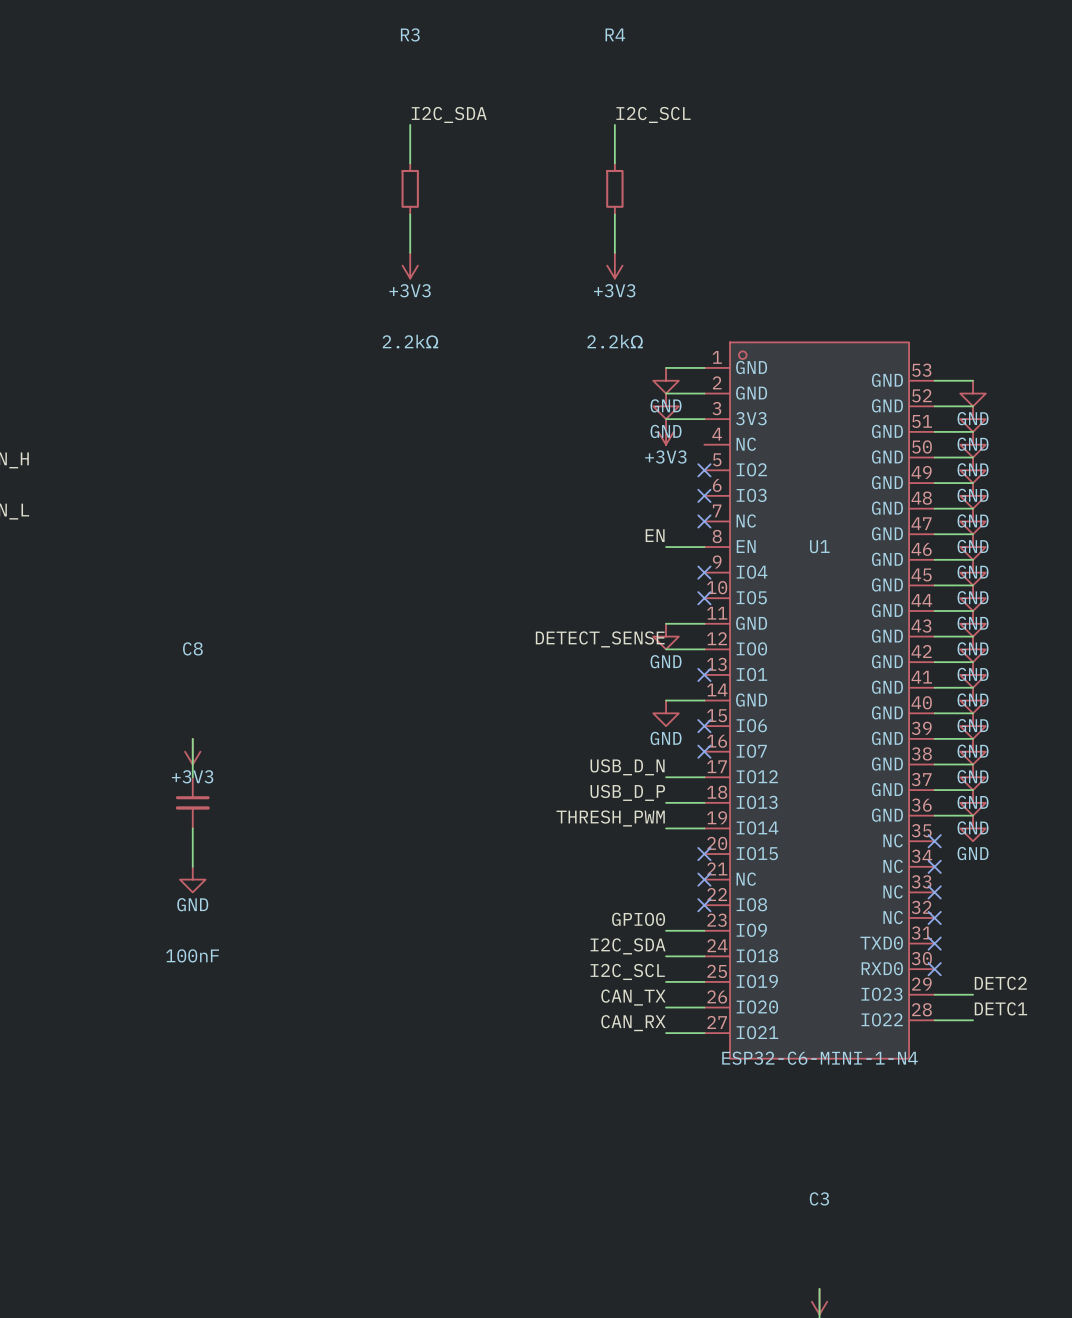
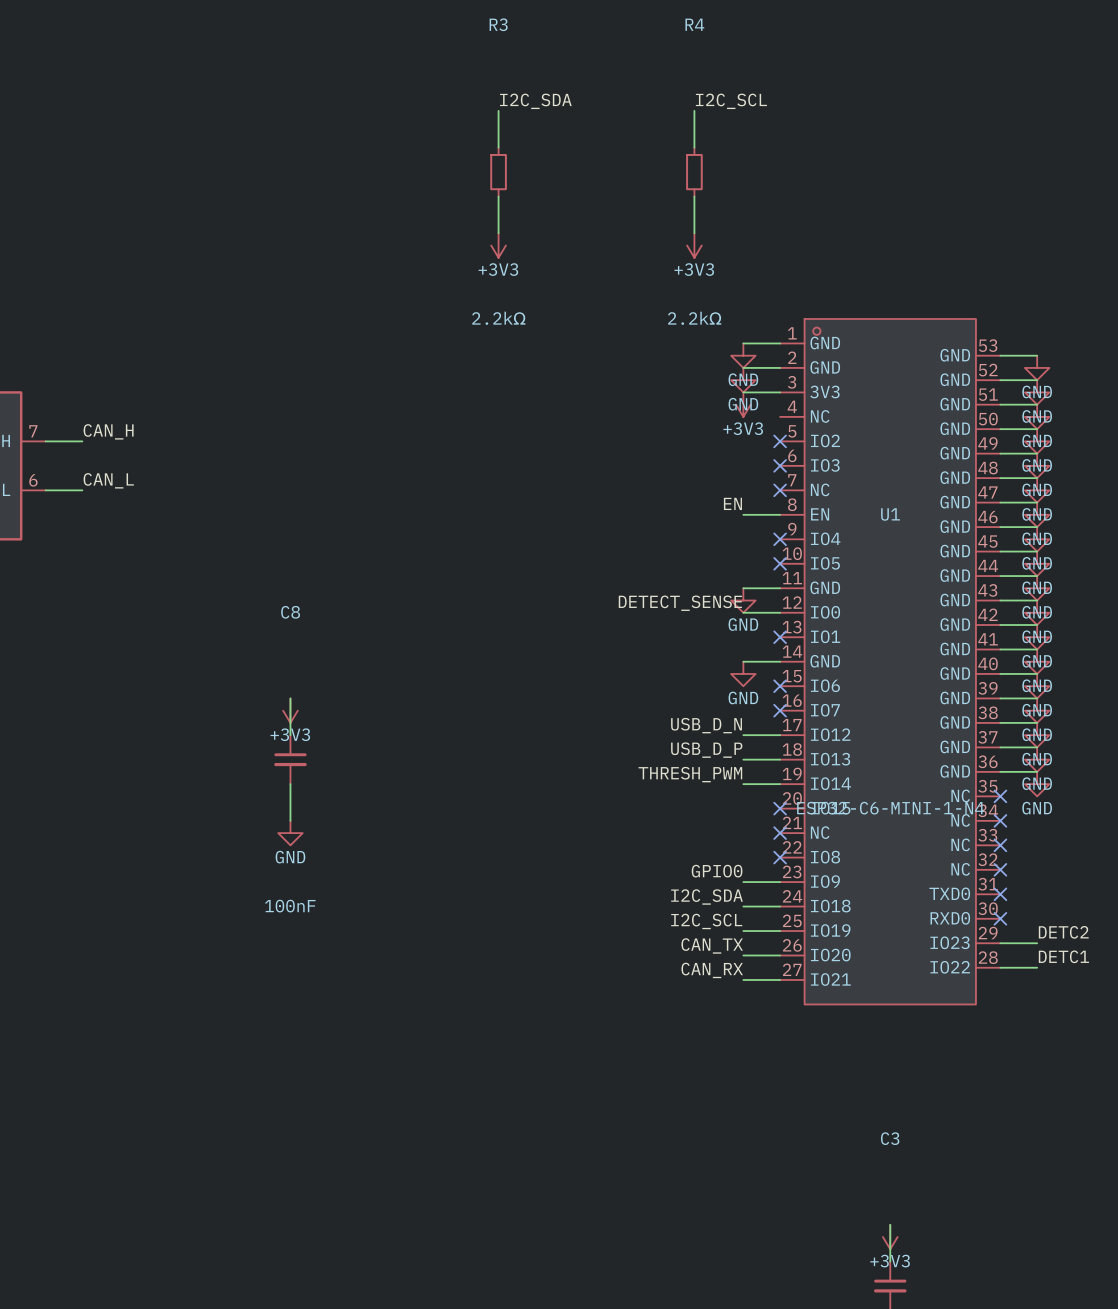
U1 value position: ESP32-C6-MINI-1-N4 (820, 1058) -> ESP32-C6-MINI-1-N4 (890, 808)

